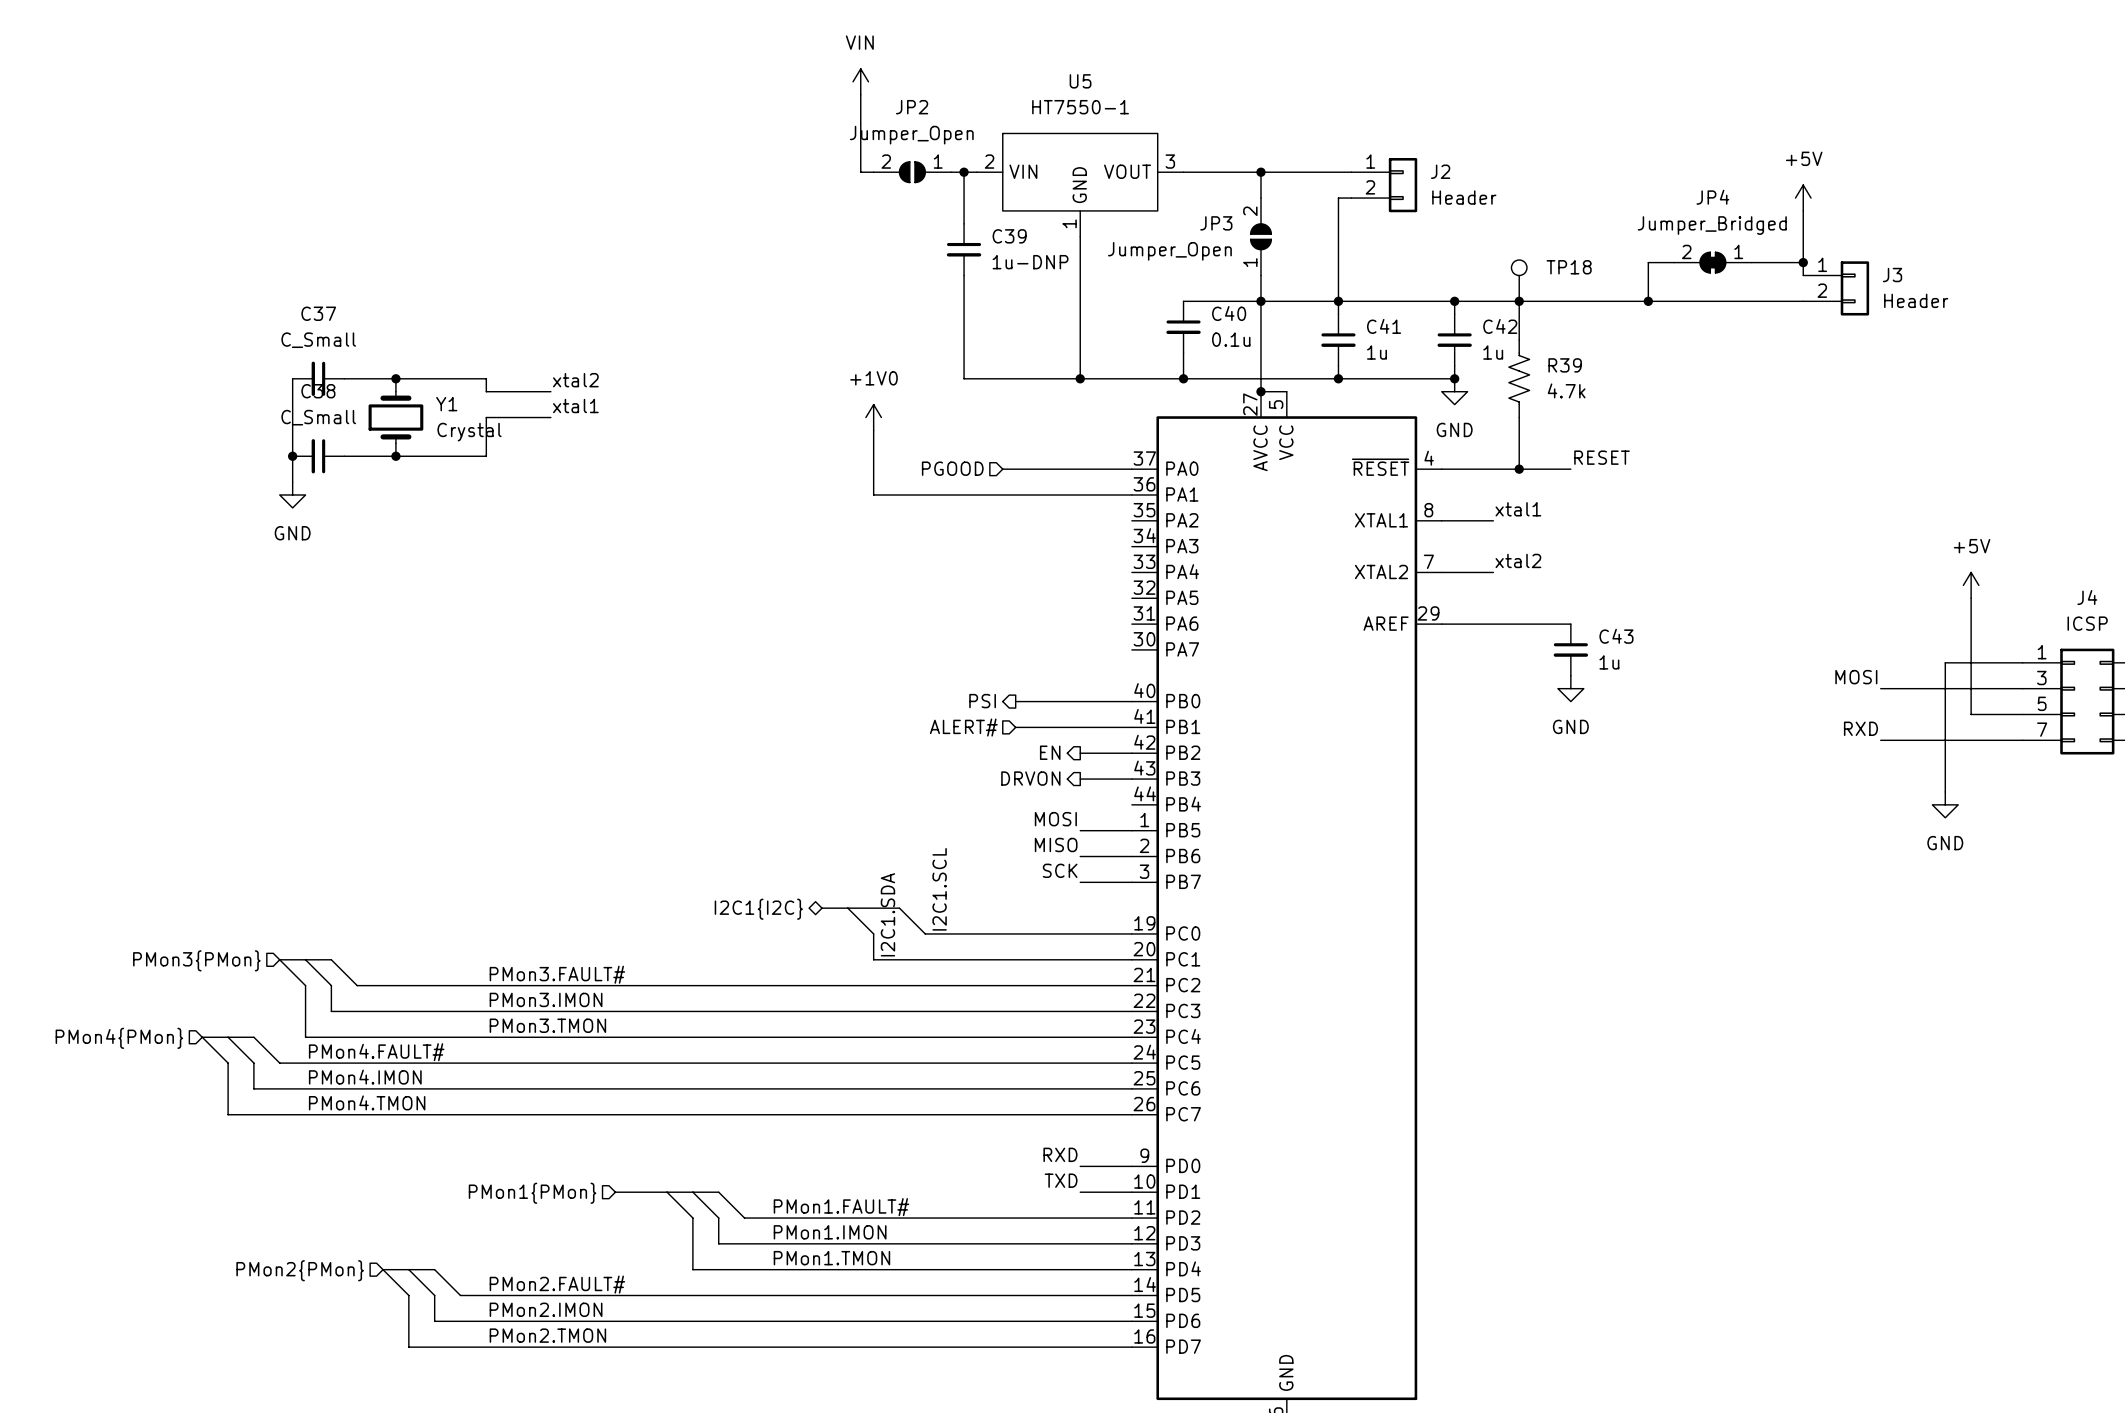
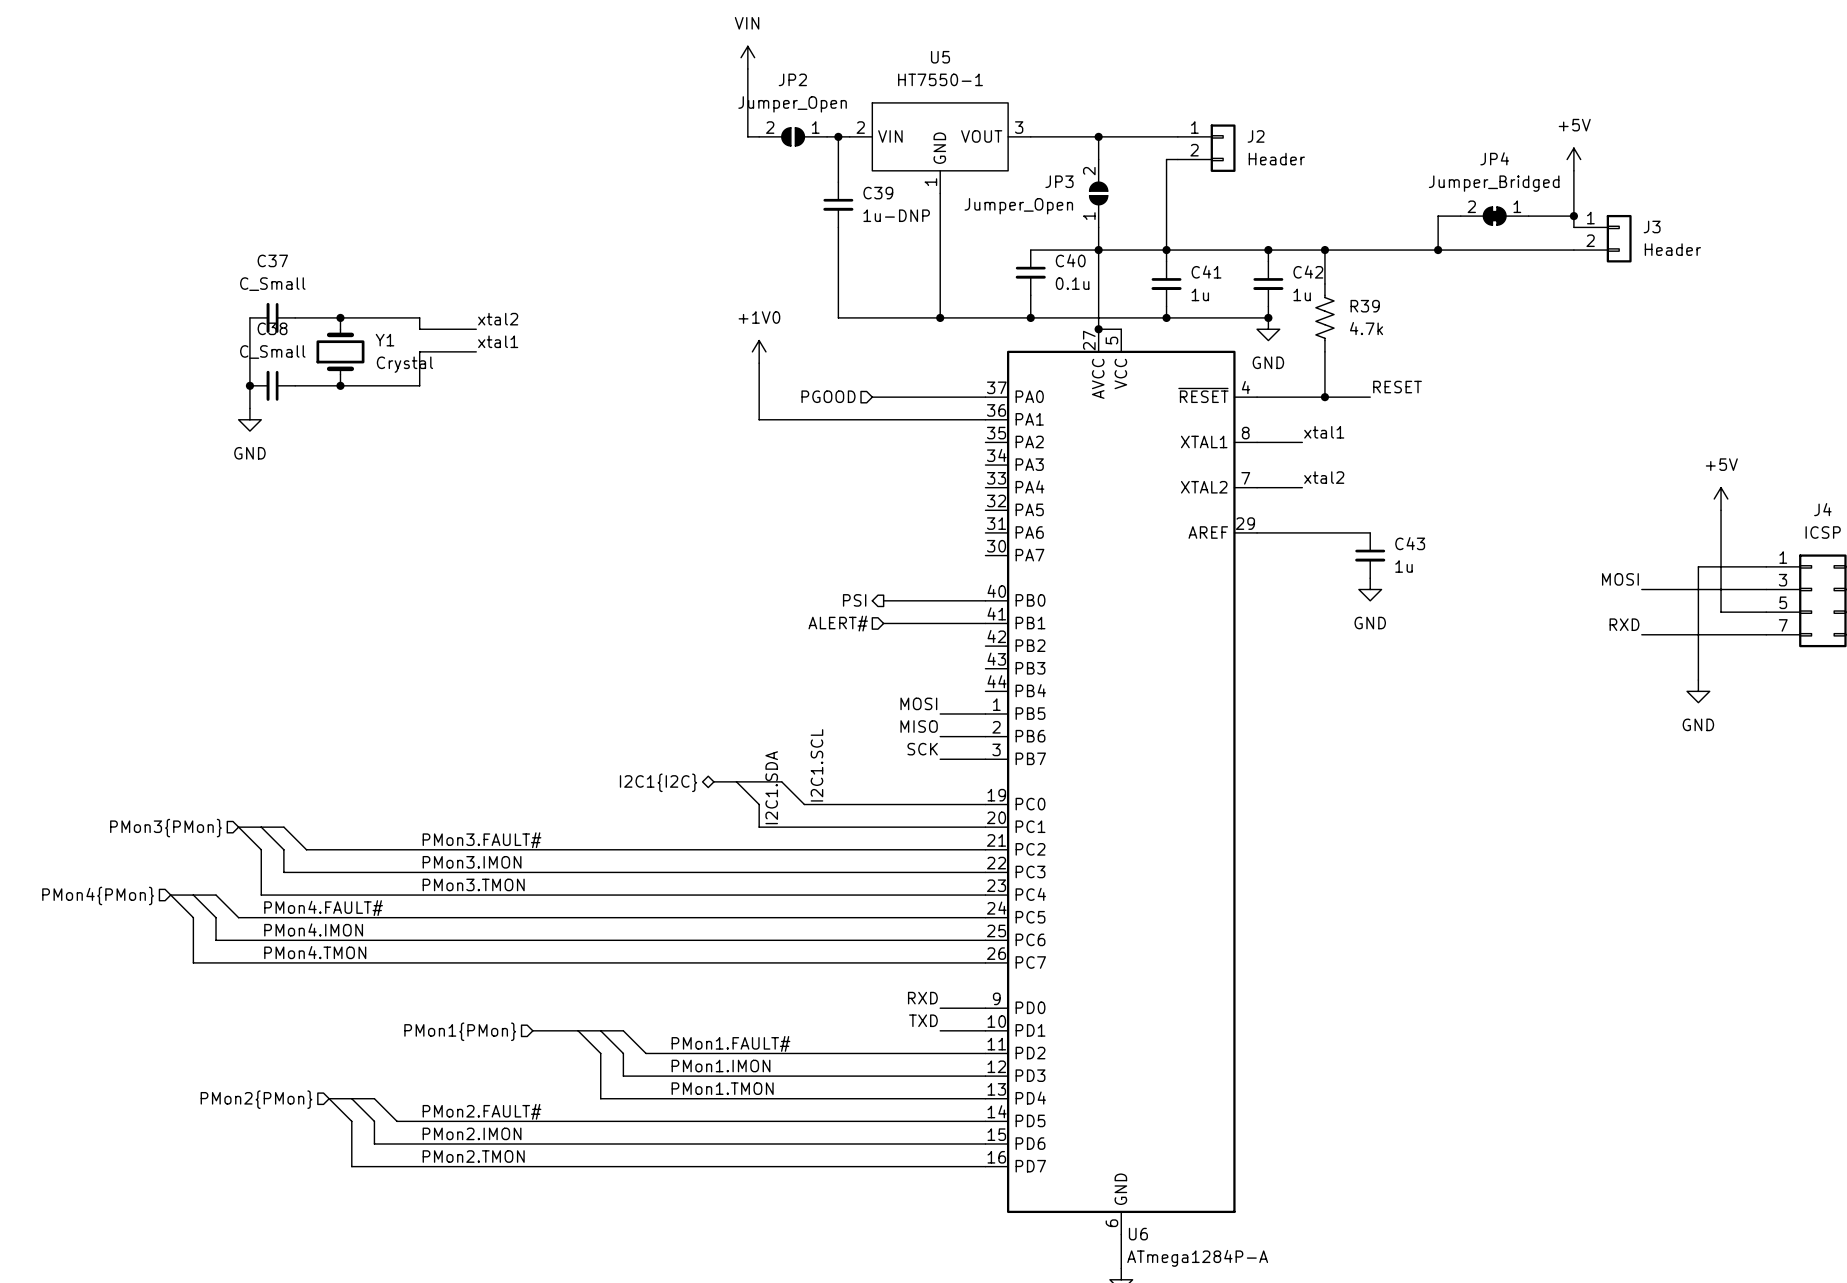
TP18: (1519, 280) -> none
hierarchical label: EN (1050, 752) -> none
wire: (1080, 753) (1131, 753) -> none
hierarchical label: DRVON (1030, 778) -> none
wire: (1080, 779) (1131, 779) -> none

